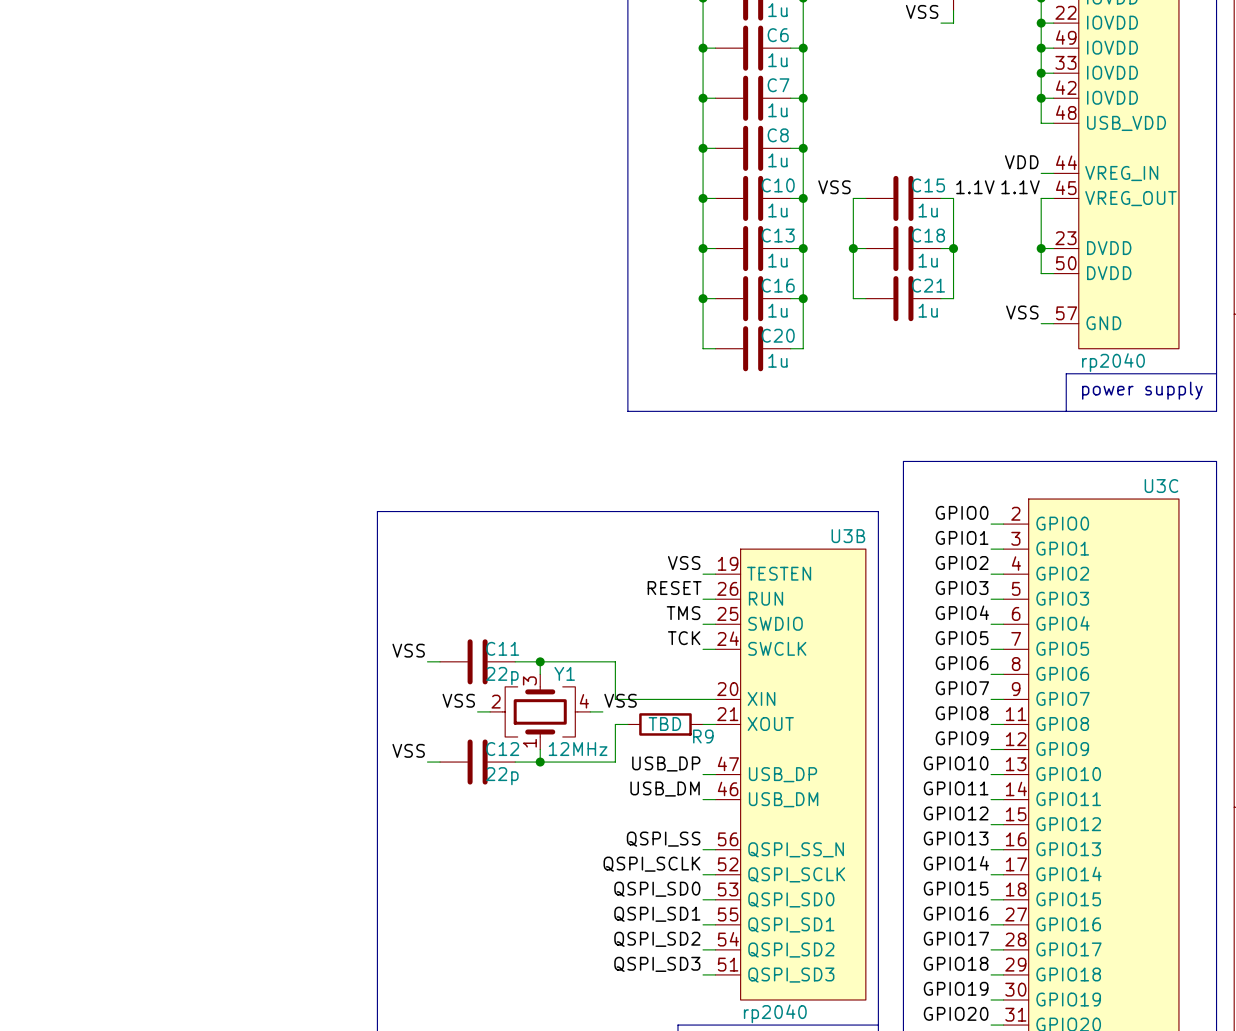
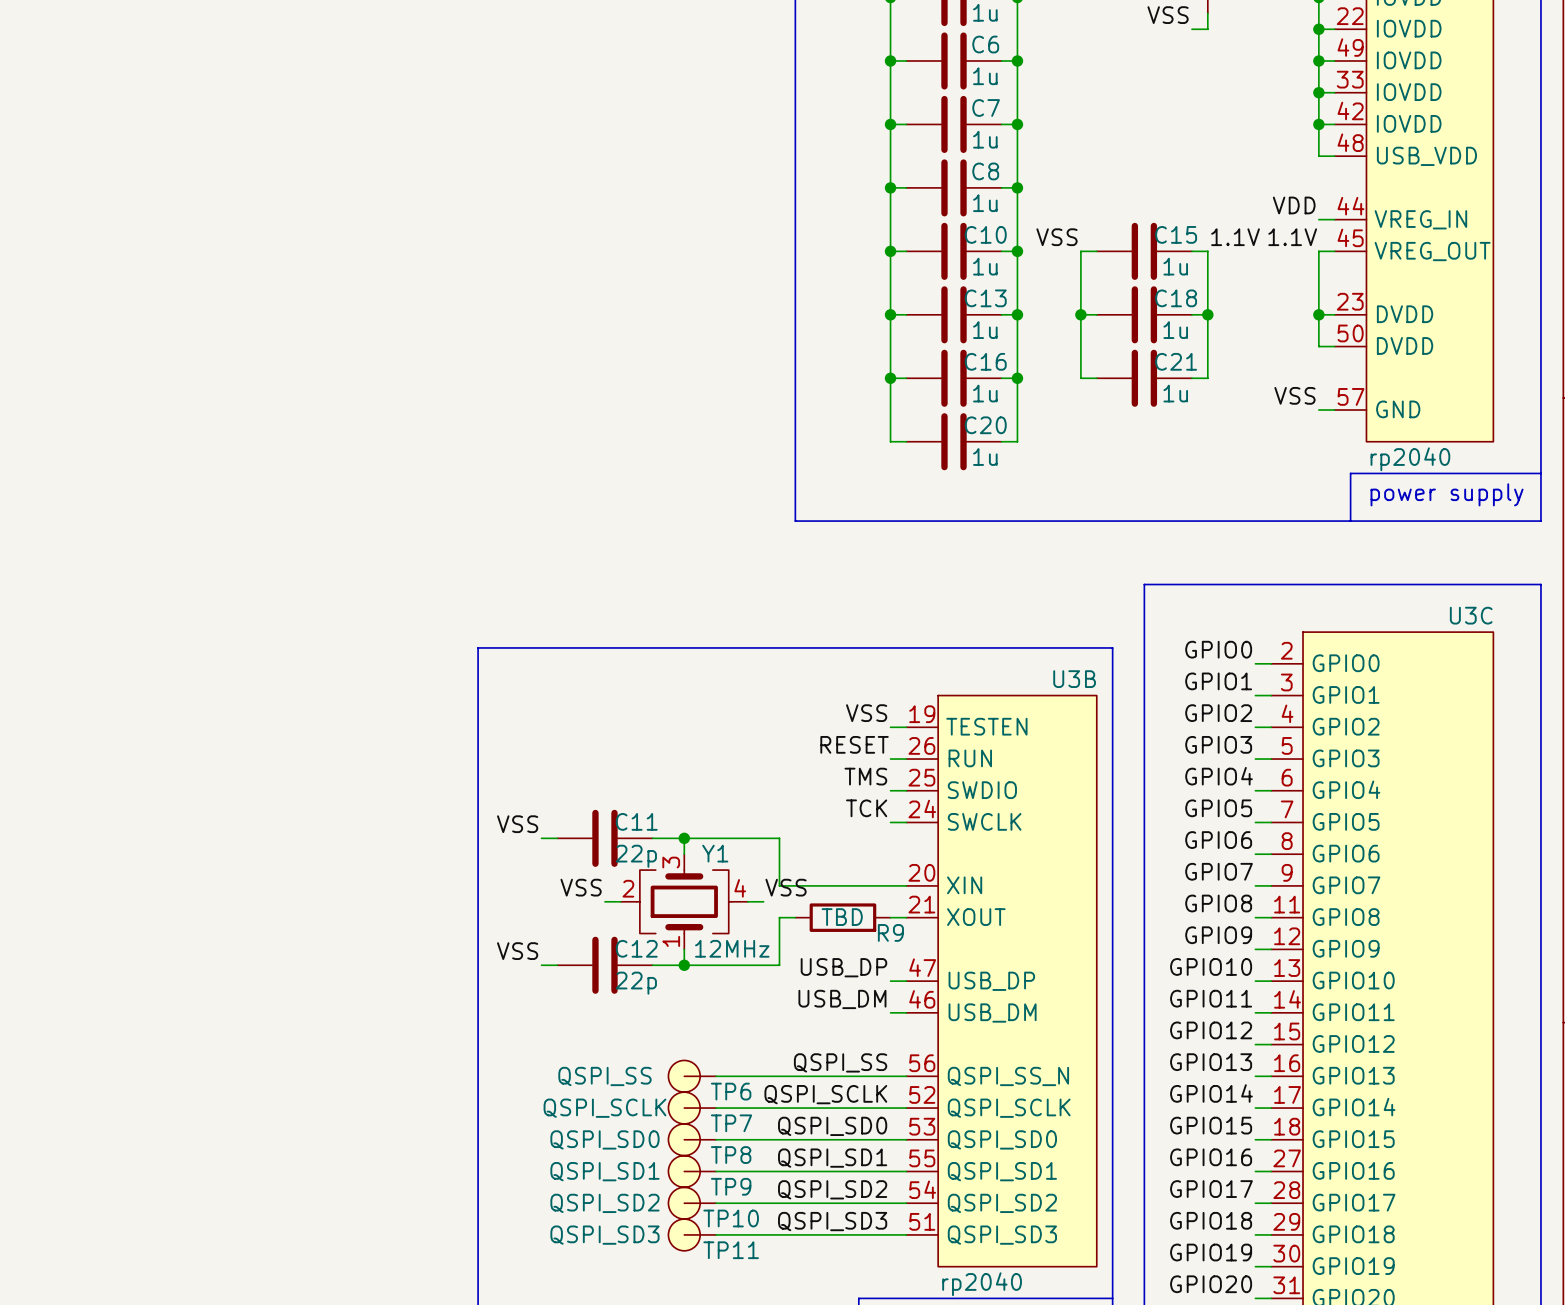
TP6: none -> QSPI_SS (692, 1076)
wire: none -> (716, 1076) (890, 1076)
TP7: none -> QSPI_SCLK (692, 1108)
wire: none -> (716, 1108) (890, 1108)
TP8: none -> QSPI_SD0 (692, 1139)
wire: none -> (716, 1139) (890, 1139)
TP9: none -> QSPI_SD1 (692, 1171)
wire: none -> (716, 1171) (890, 1171)
TP10: none -> QSPI_SD2 (692, 1203)
wire: none -> (716, 1203) (890, 1203)
TP11: none -> QSPI_SD3 (692, 1234)
wire: none -> (716, 1234) (890, 1234)

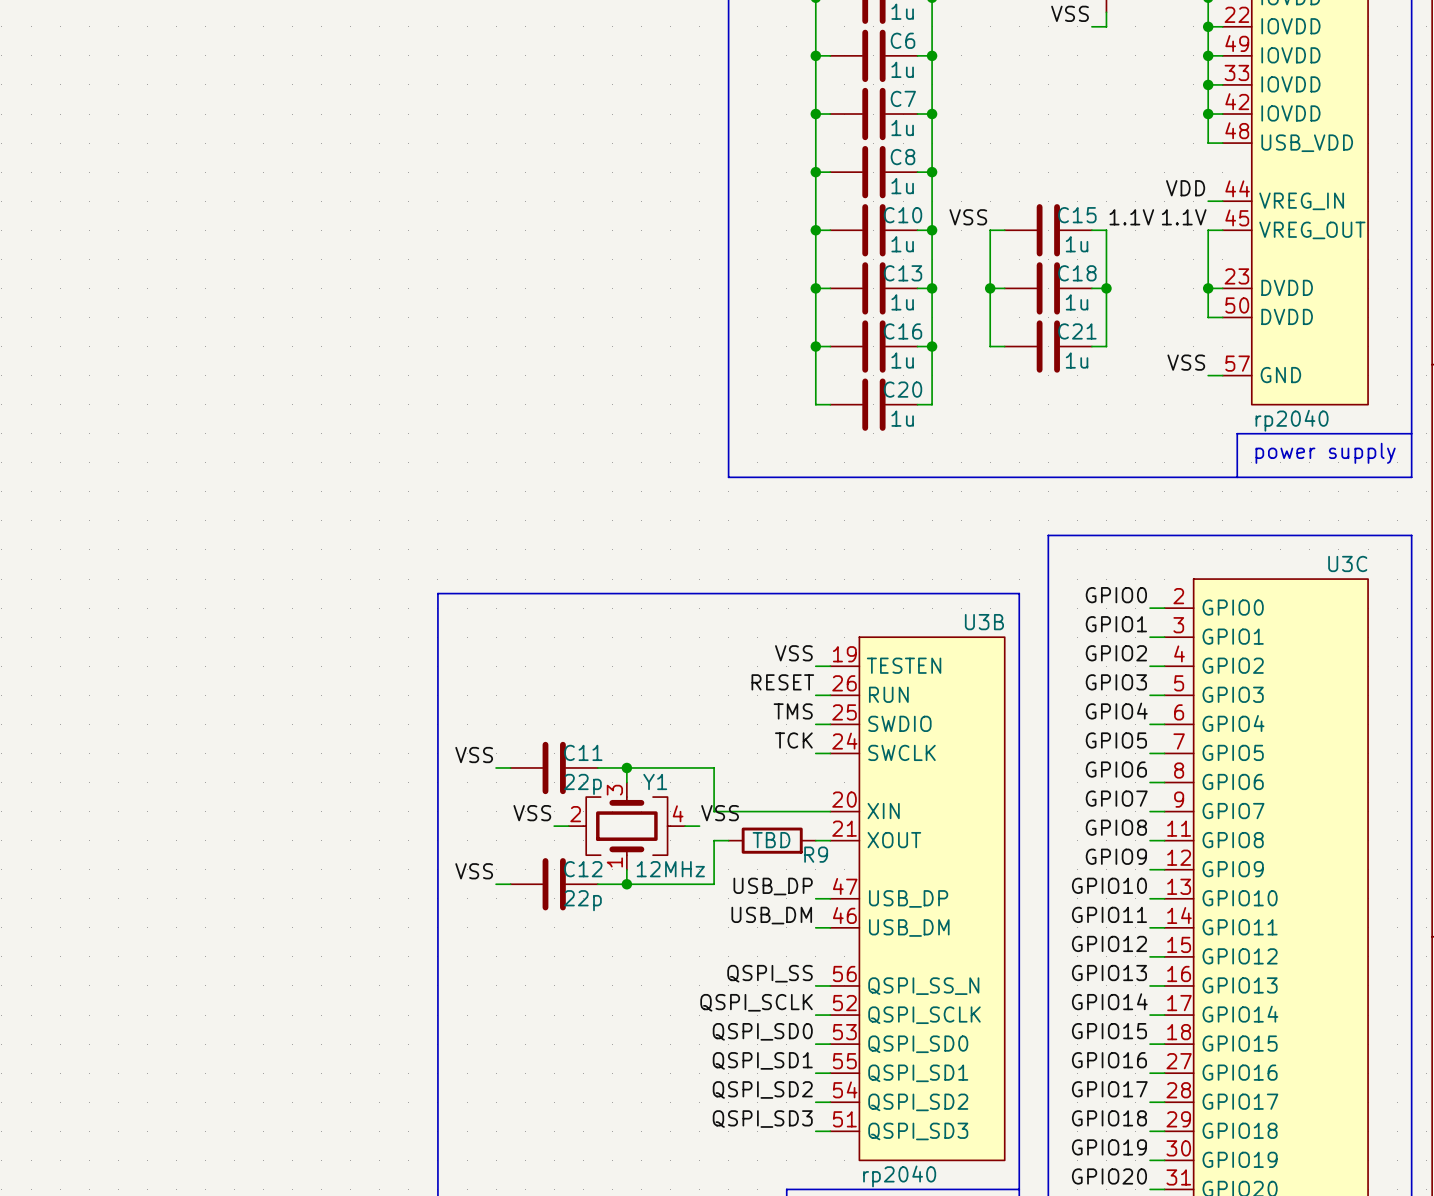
TP6: QSPI_SS (692, 1076) -> none
wire: (716, 1076) (890, 1076) -> none
TP7: QSPI_SCLK (692, 1108) -> none
wire: (716, 1108) (890, 1108) -> none
TP8: QSPI_SD0 (692, 1139) -> none
wire: (716, 1139) (890, 1139) -> none
TP9: QSPI_SD1 (692, 1171) -> none
wire: (716, 1171) (890, 1171) -> none
TP10: QSPI_SD2 (692, 1203) -> none
wire: (716, 1203) (890, 1203) -> none
TP11: QSPI_SD3 (692, 1234) -> none
wire: (716, 1234) (890, 1234) -> none

